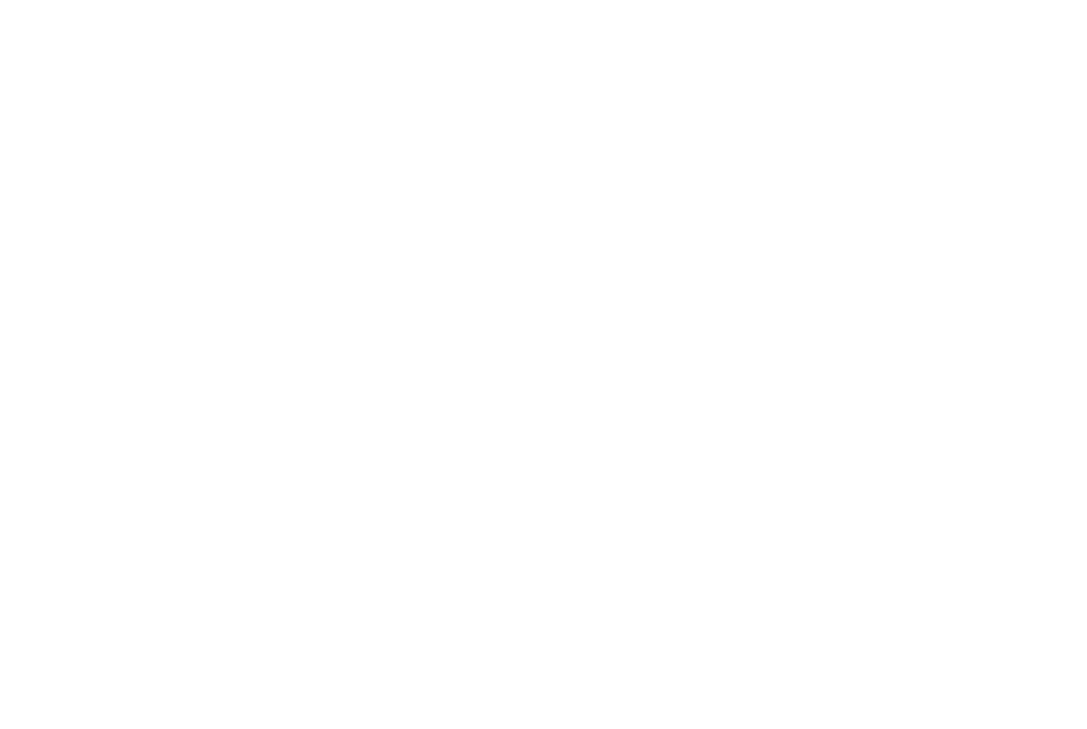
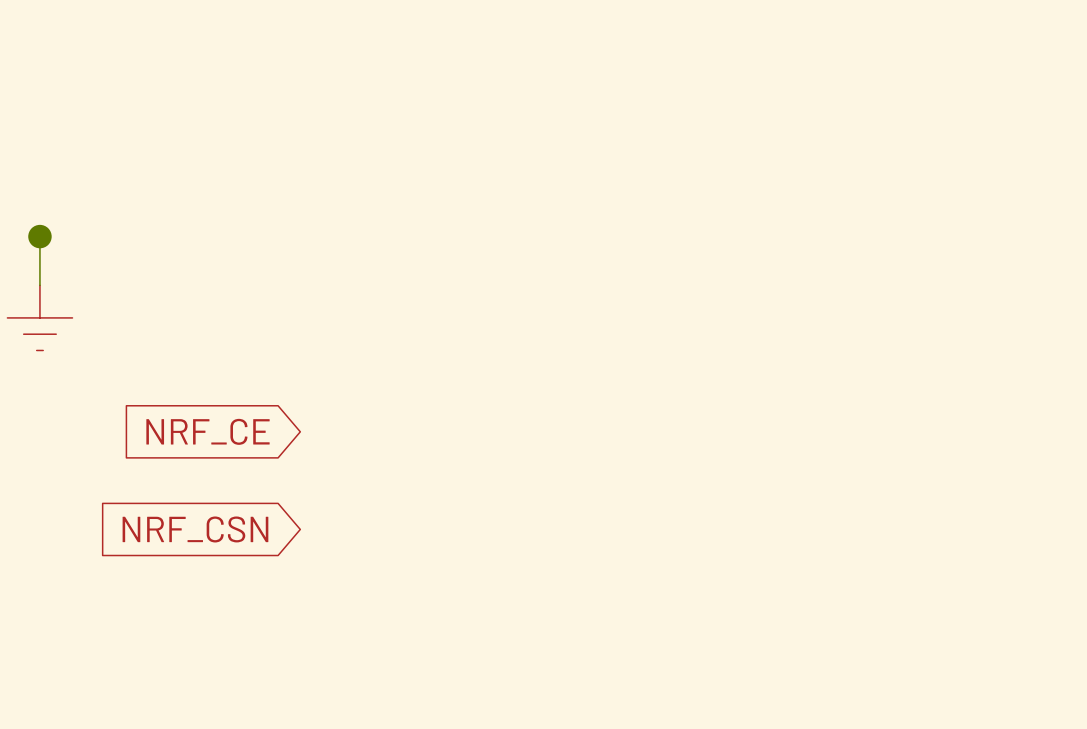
wire: none -> (39, 236) (39, 285)
junction: none -> (39, 236)
power symbol: none -> (39, 317)
global label: none -> NRF_CE (208, 431)
global label: none -> NRF_CSN (195, 529)

